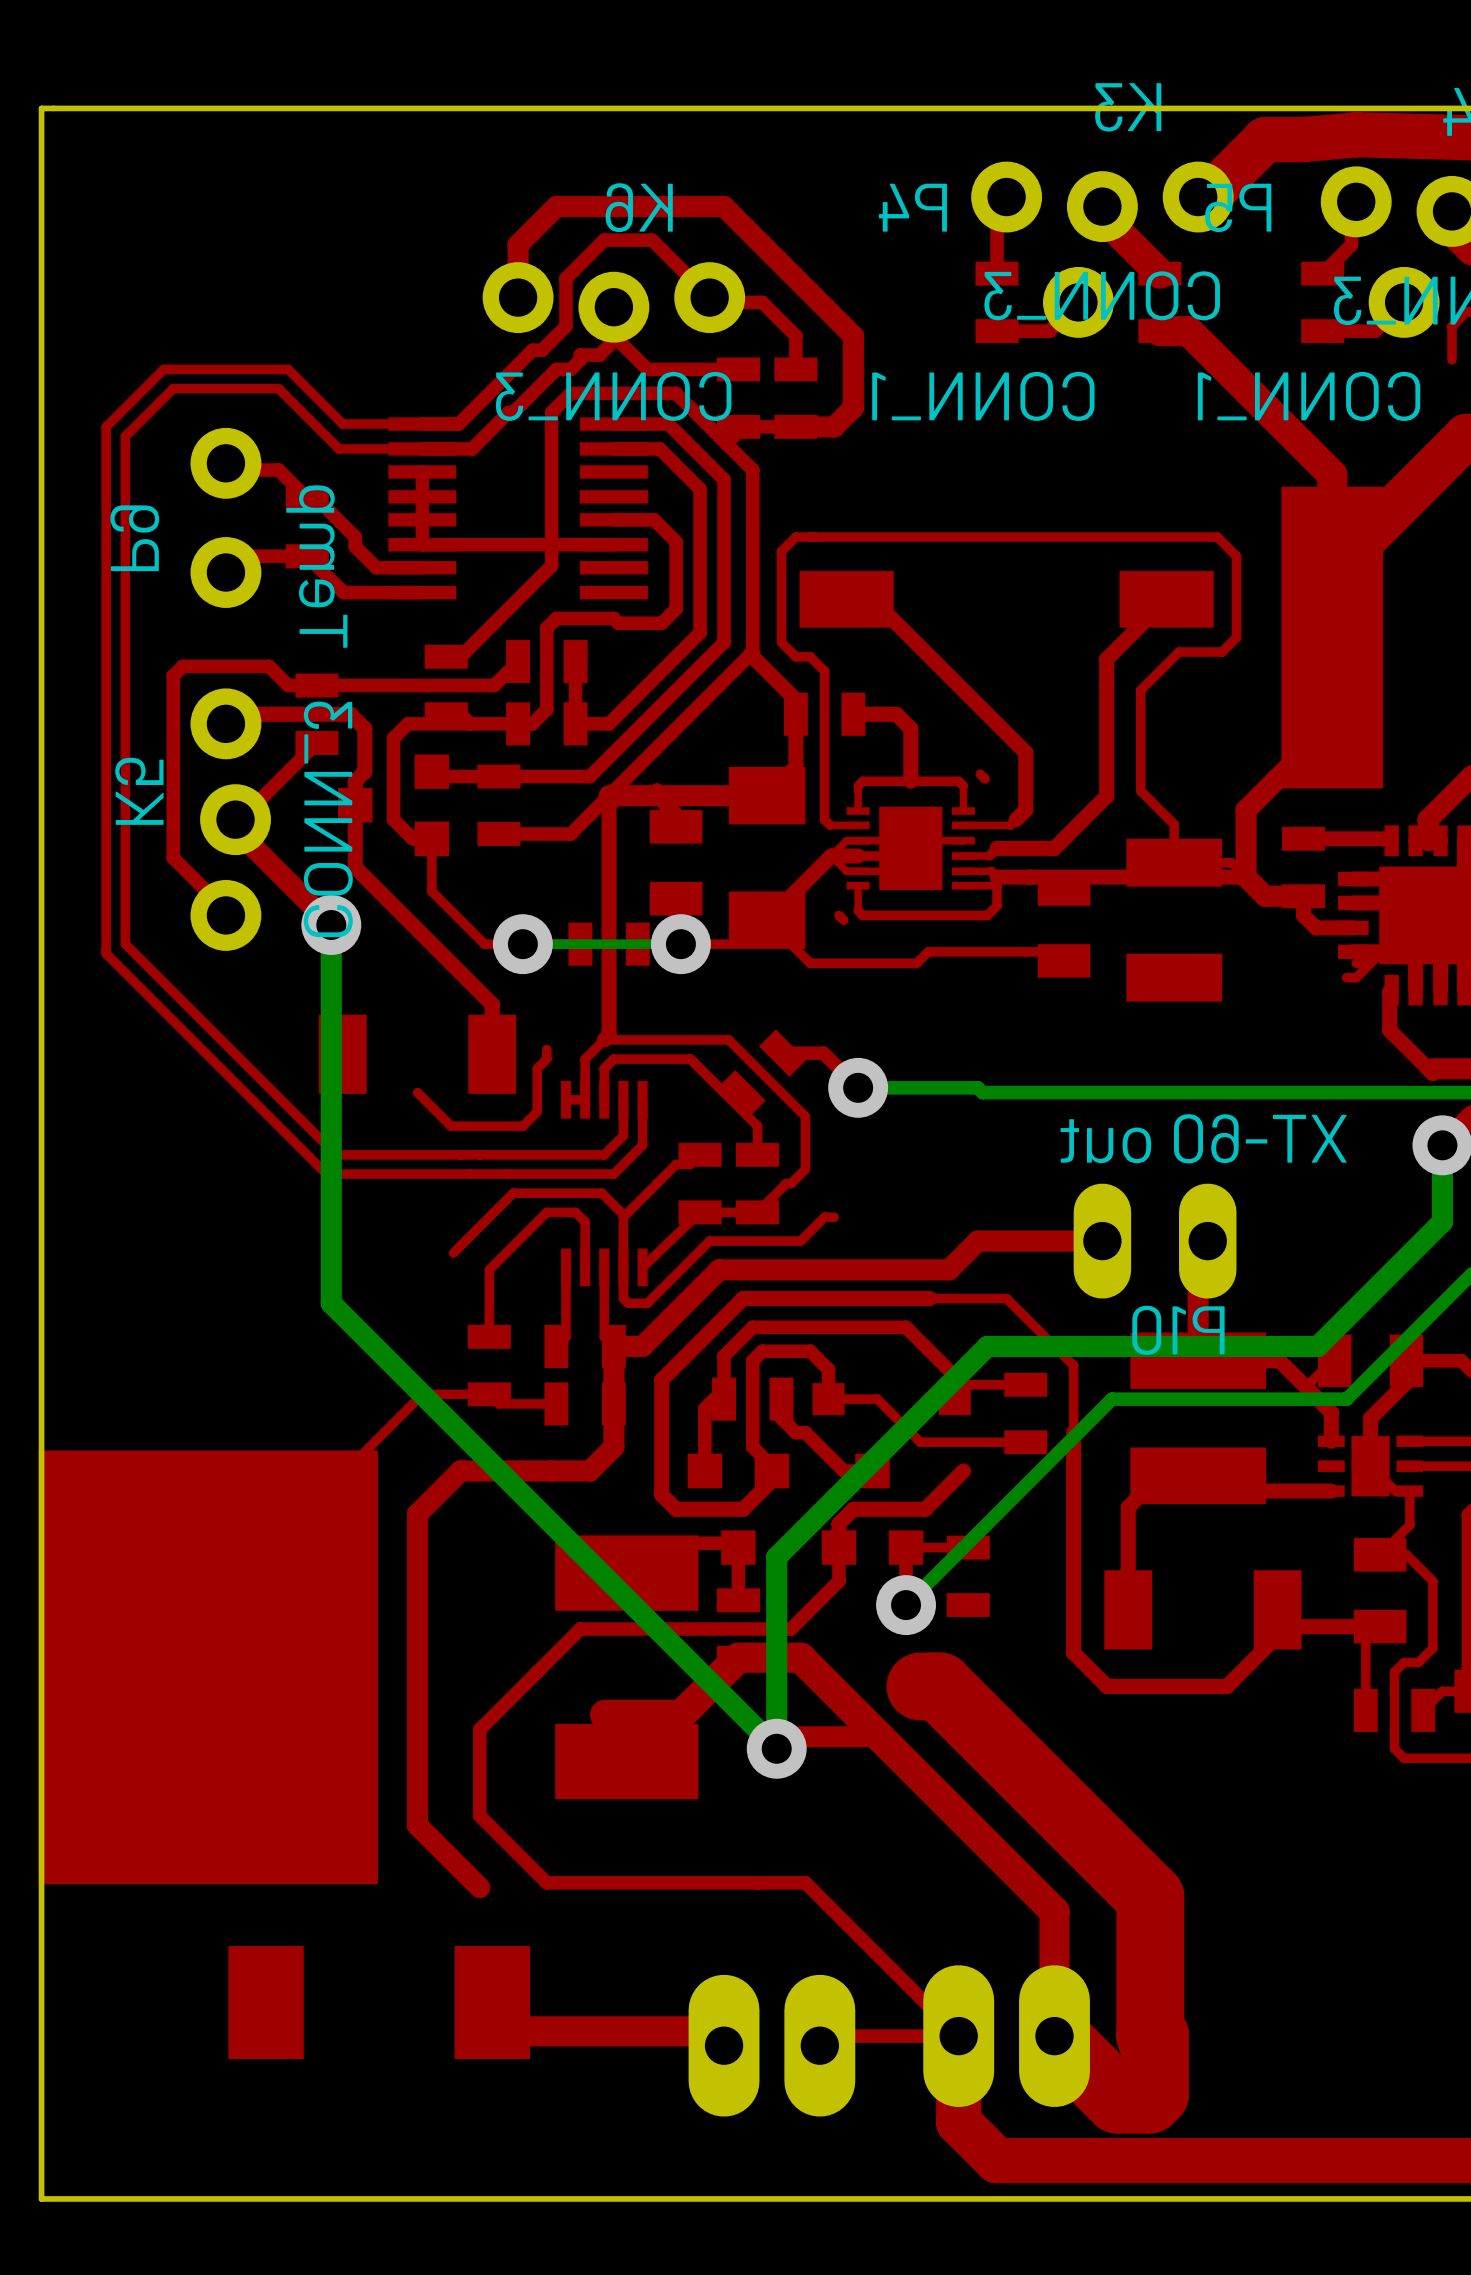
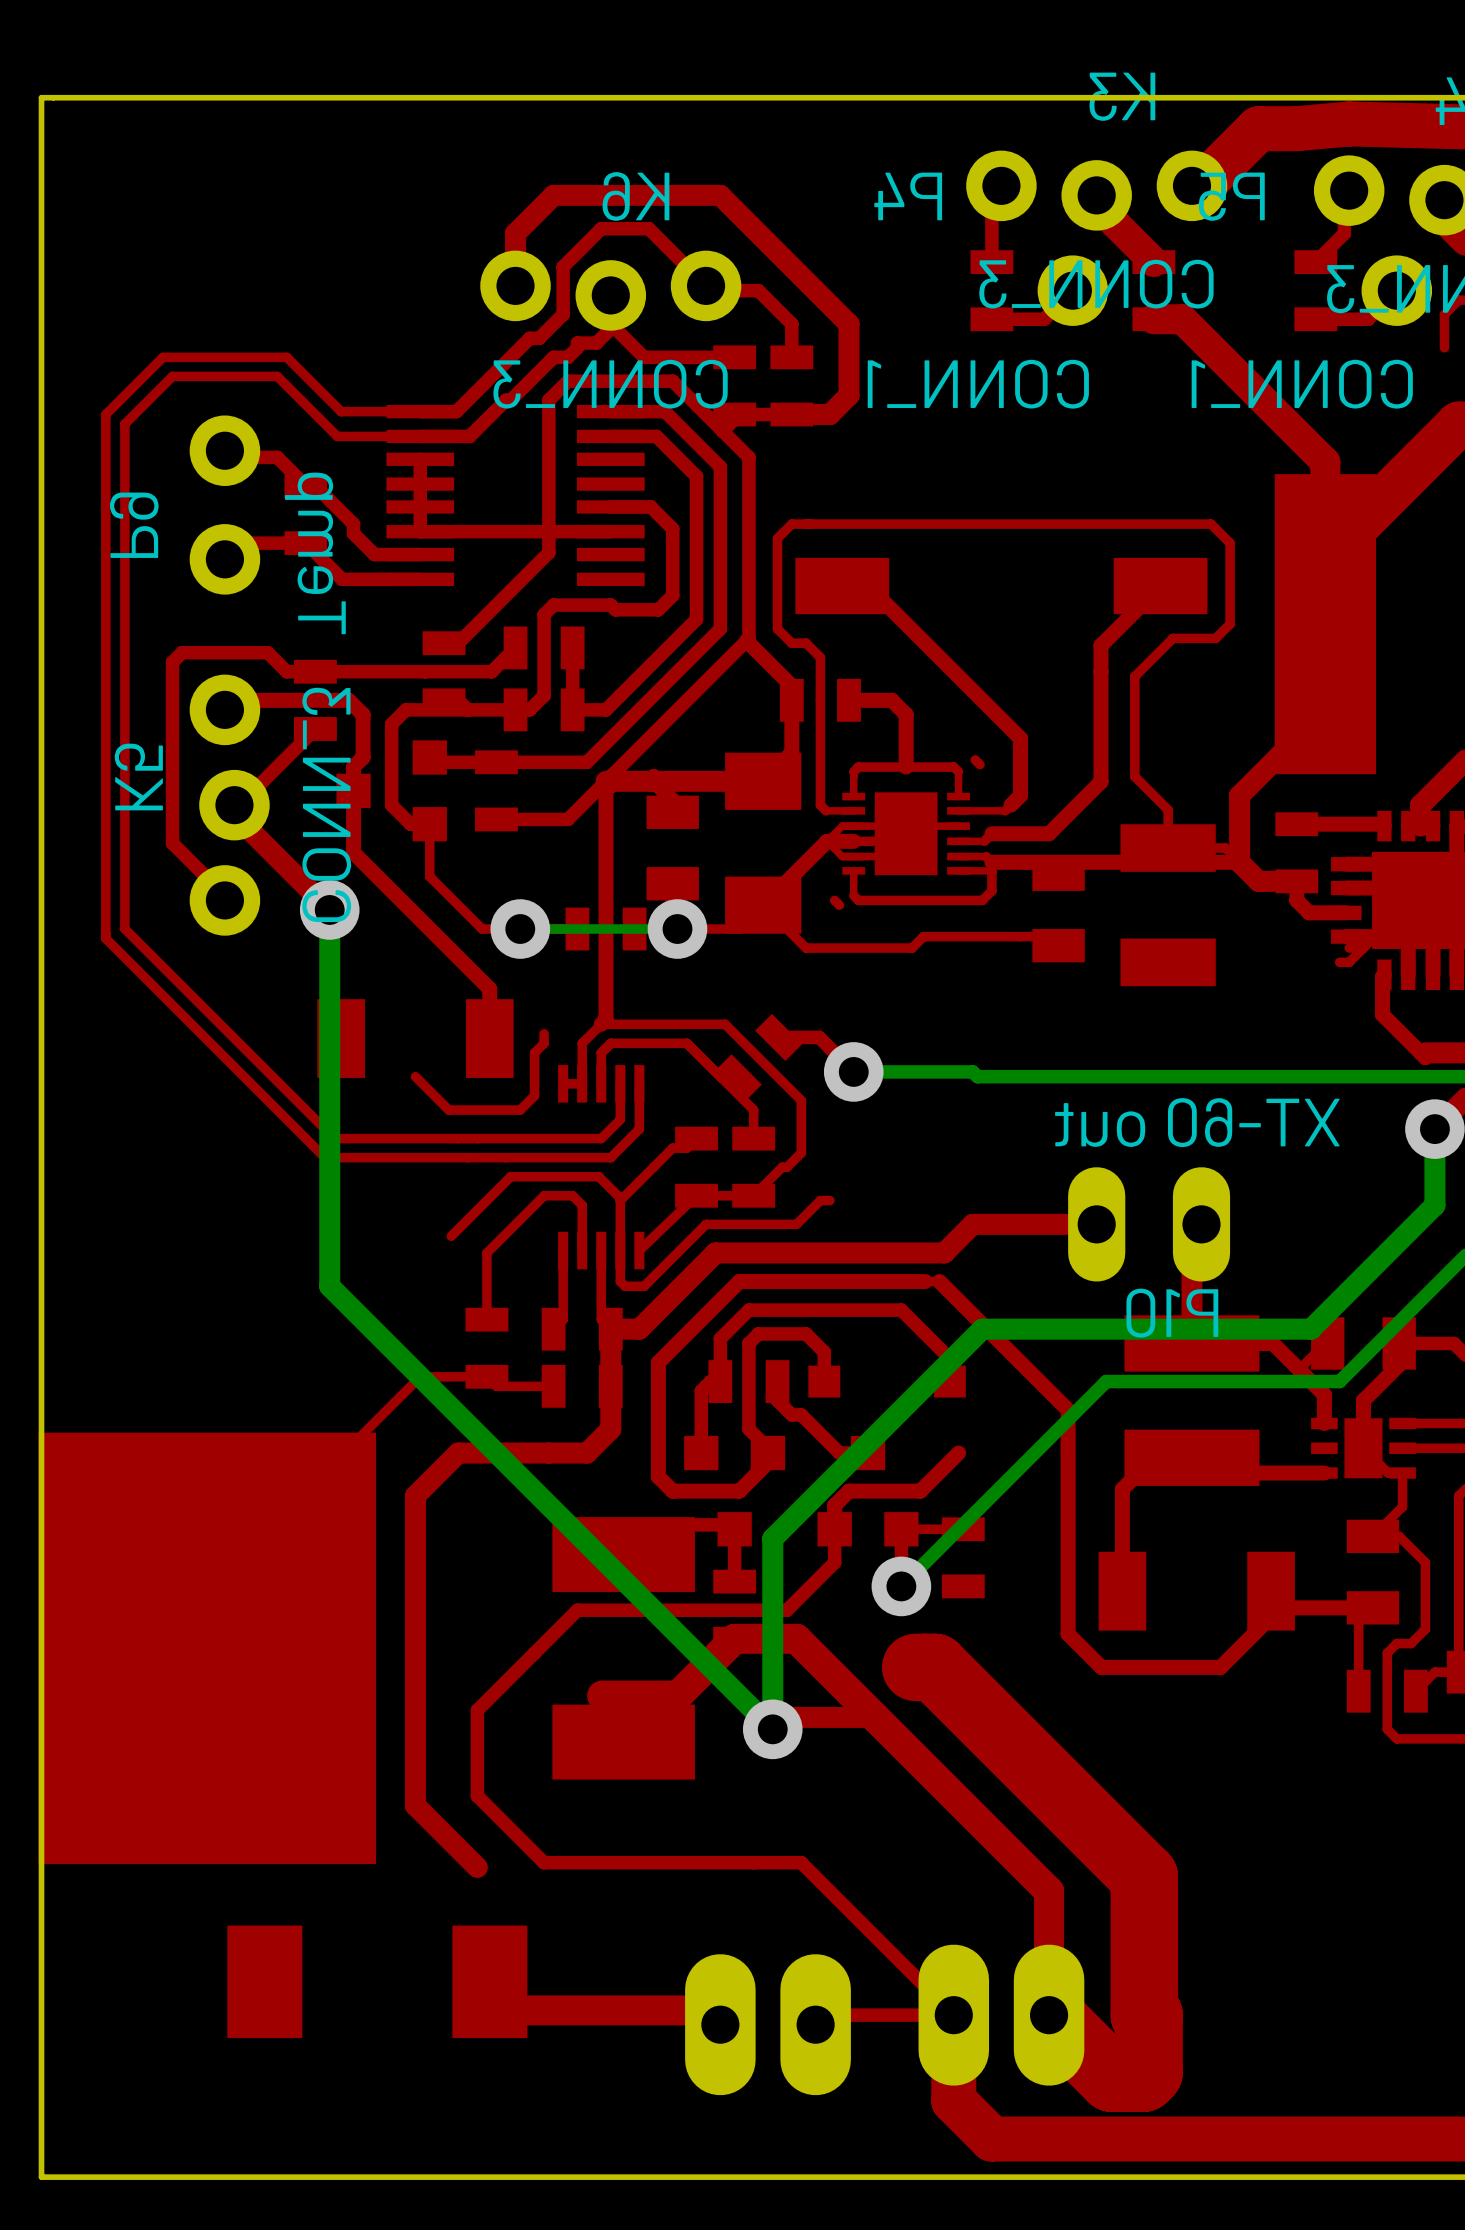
top track: (944, 1298) (1006, 1298) (1073, 1365) (1073, 1427) -> (939, 1281) (1068, 1410)
top track: (1025, 1384) (969, 1384) (954, 1399) -> none
top track: (828, 1399) (877, 1399) (920, 1442) (1025, 1442) -> none
part: (1025, 1413) -> none

